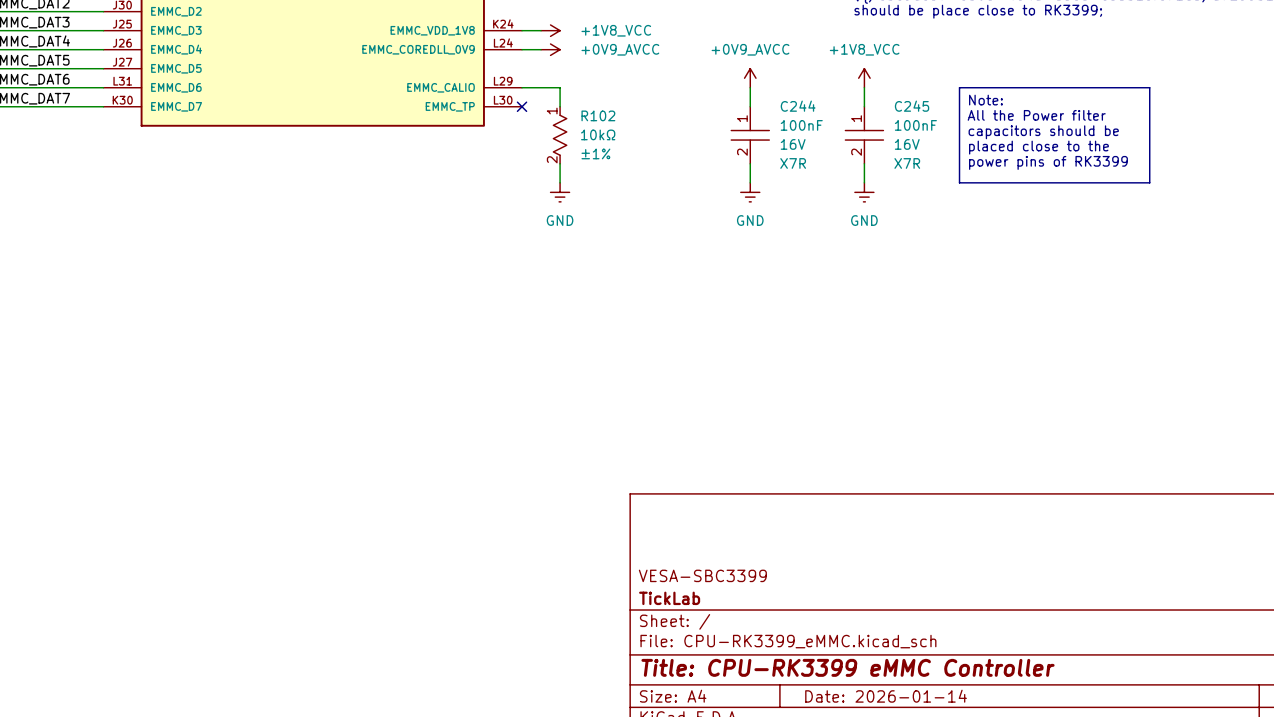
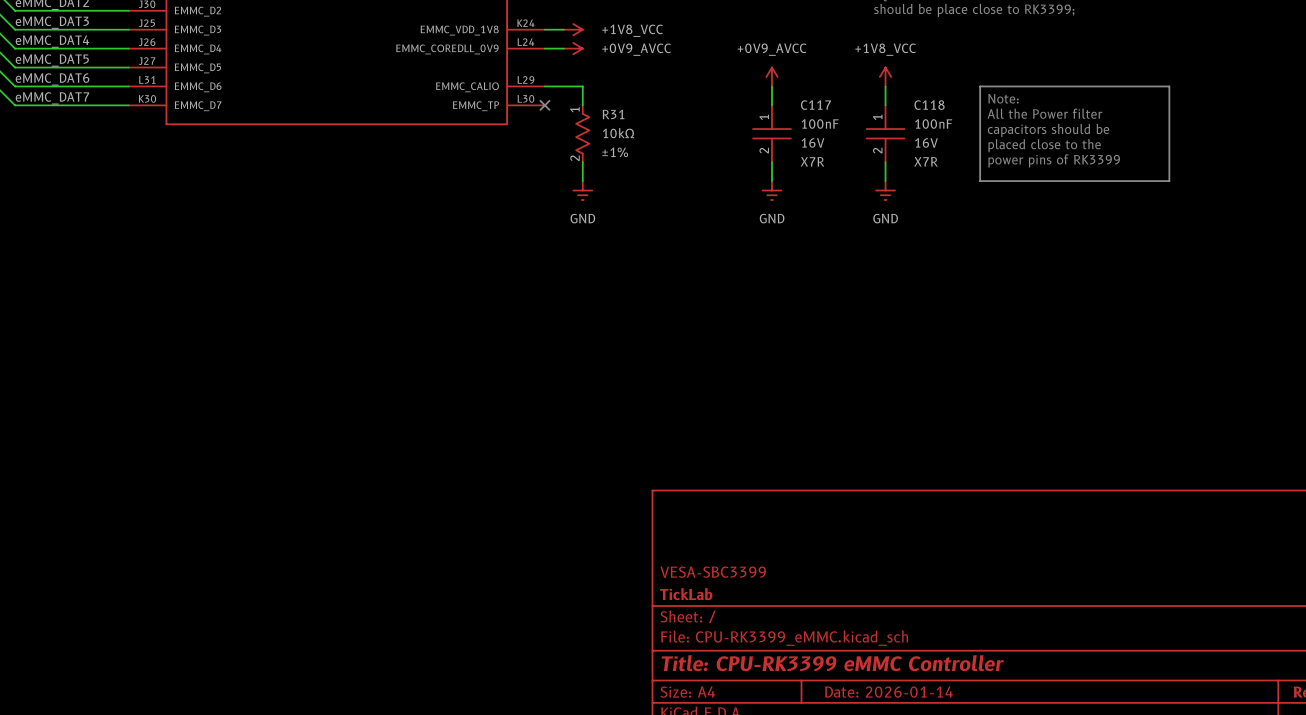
C244 name: C244 (798, 106) -> C117 (815, 105)
C245 name: C245 (912, 106) -> C118 (929, 105)
R102 name: R102 (598, 115) -> R31 (613, 114)

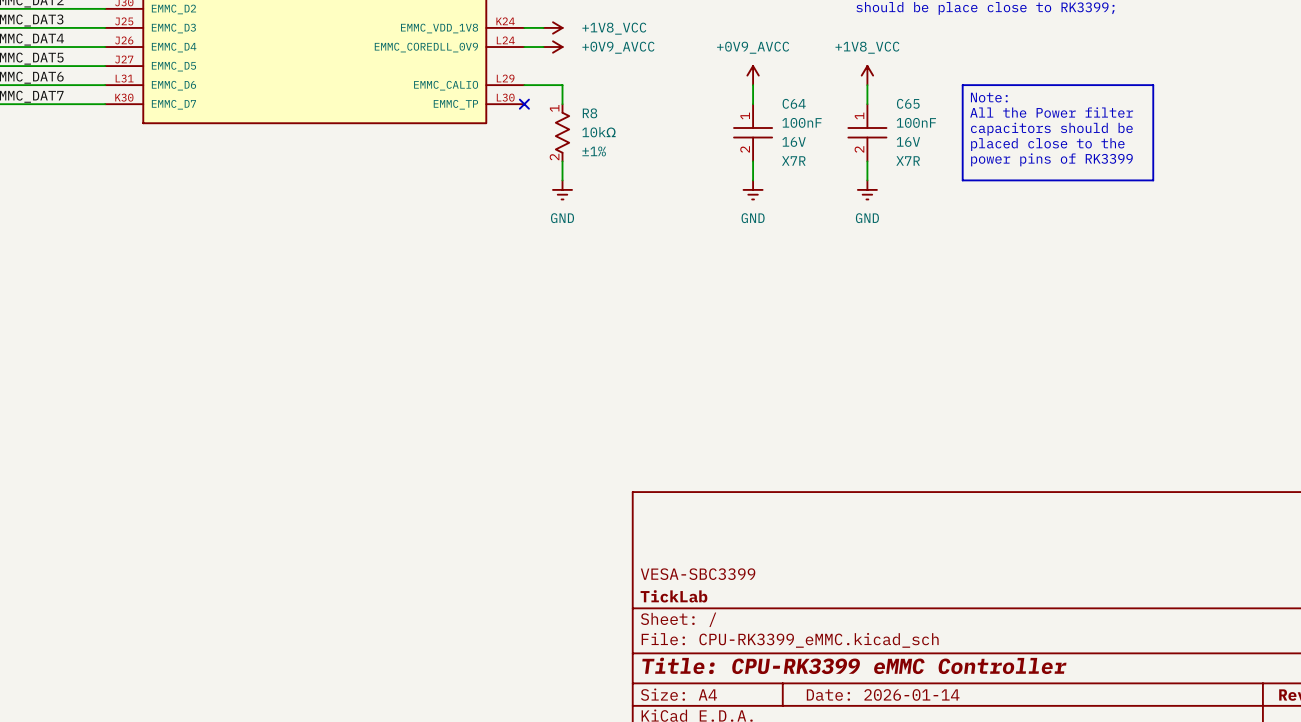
C117 name: C117 (815, 105) -> C64 (794, 103)
C118 name: C118 (929, 105) -> C65 (908, 103)
R31 name: R31 (613, 114) -> R8 (589, 113)

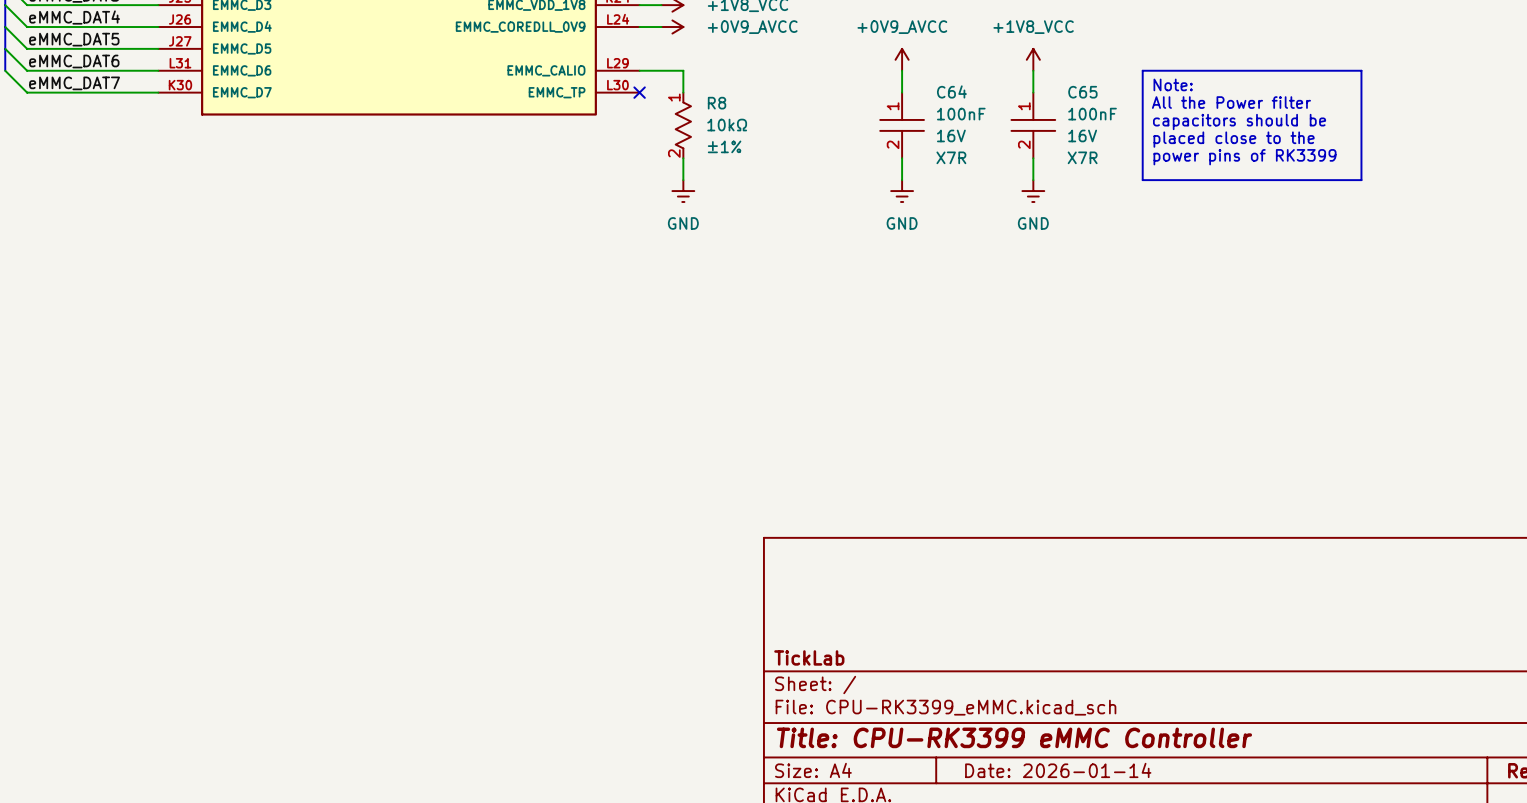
title block: VESA-SBC3399 (698, 574) -> none

